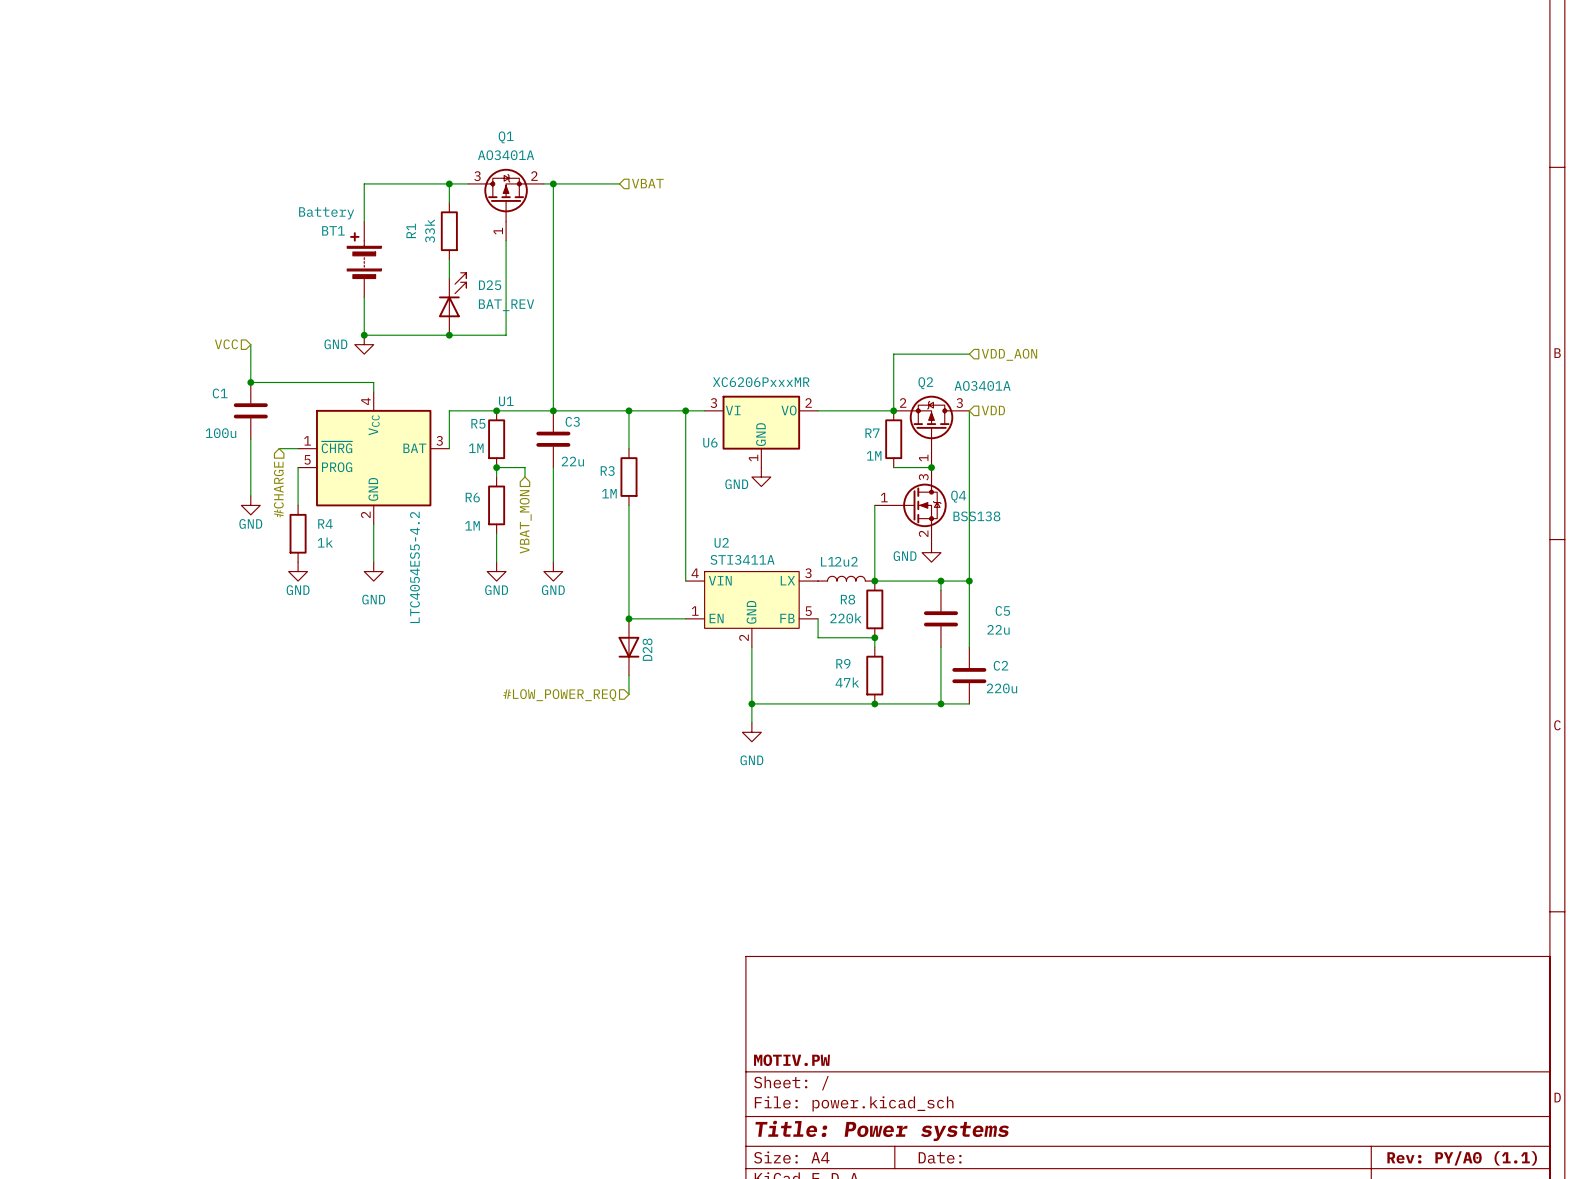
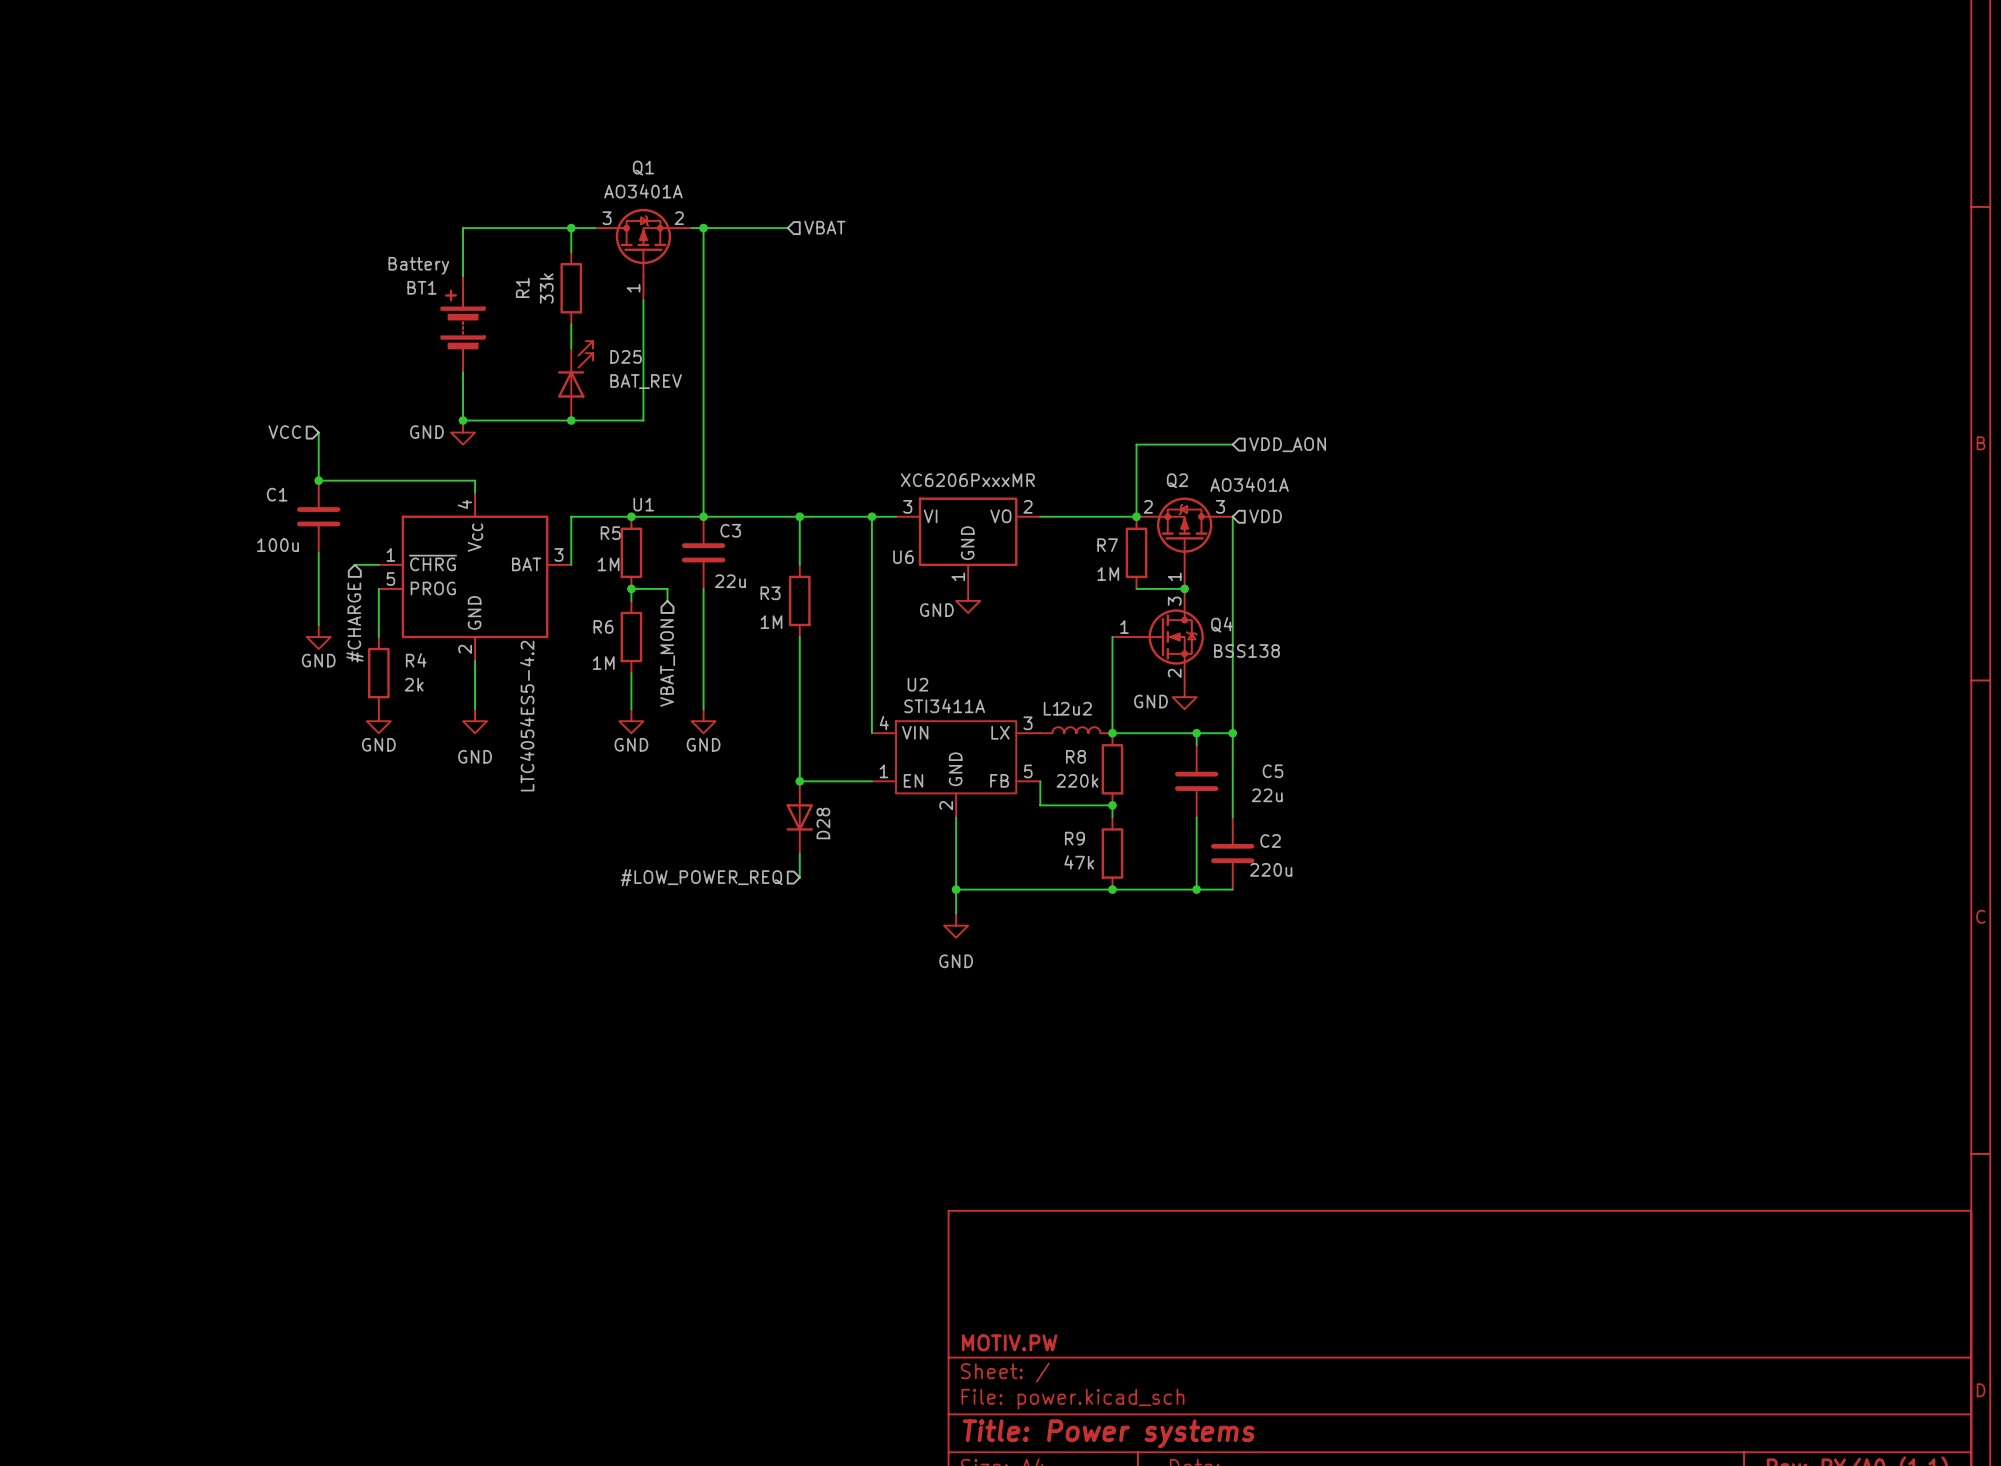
R4 value: 1k (325, 542) -> 2k (414, 684)

